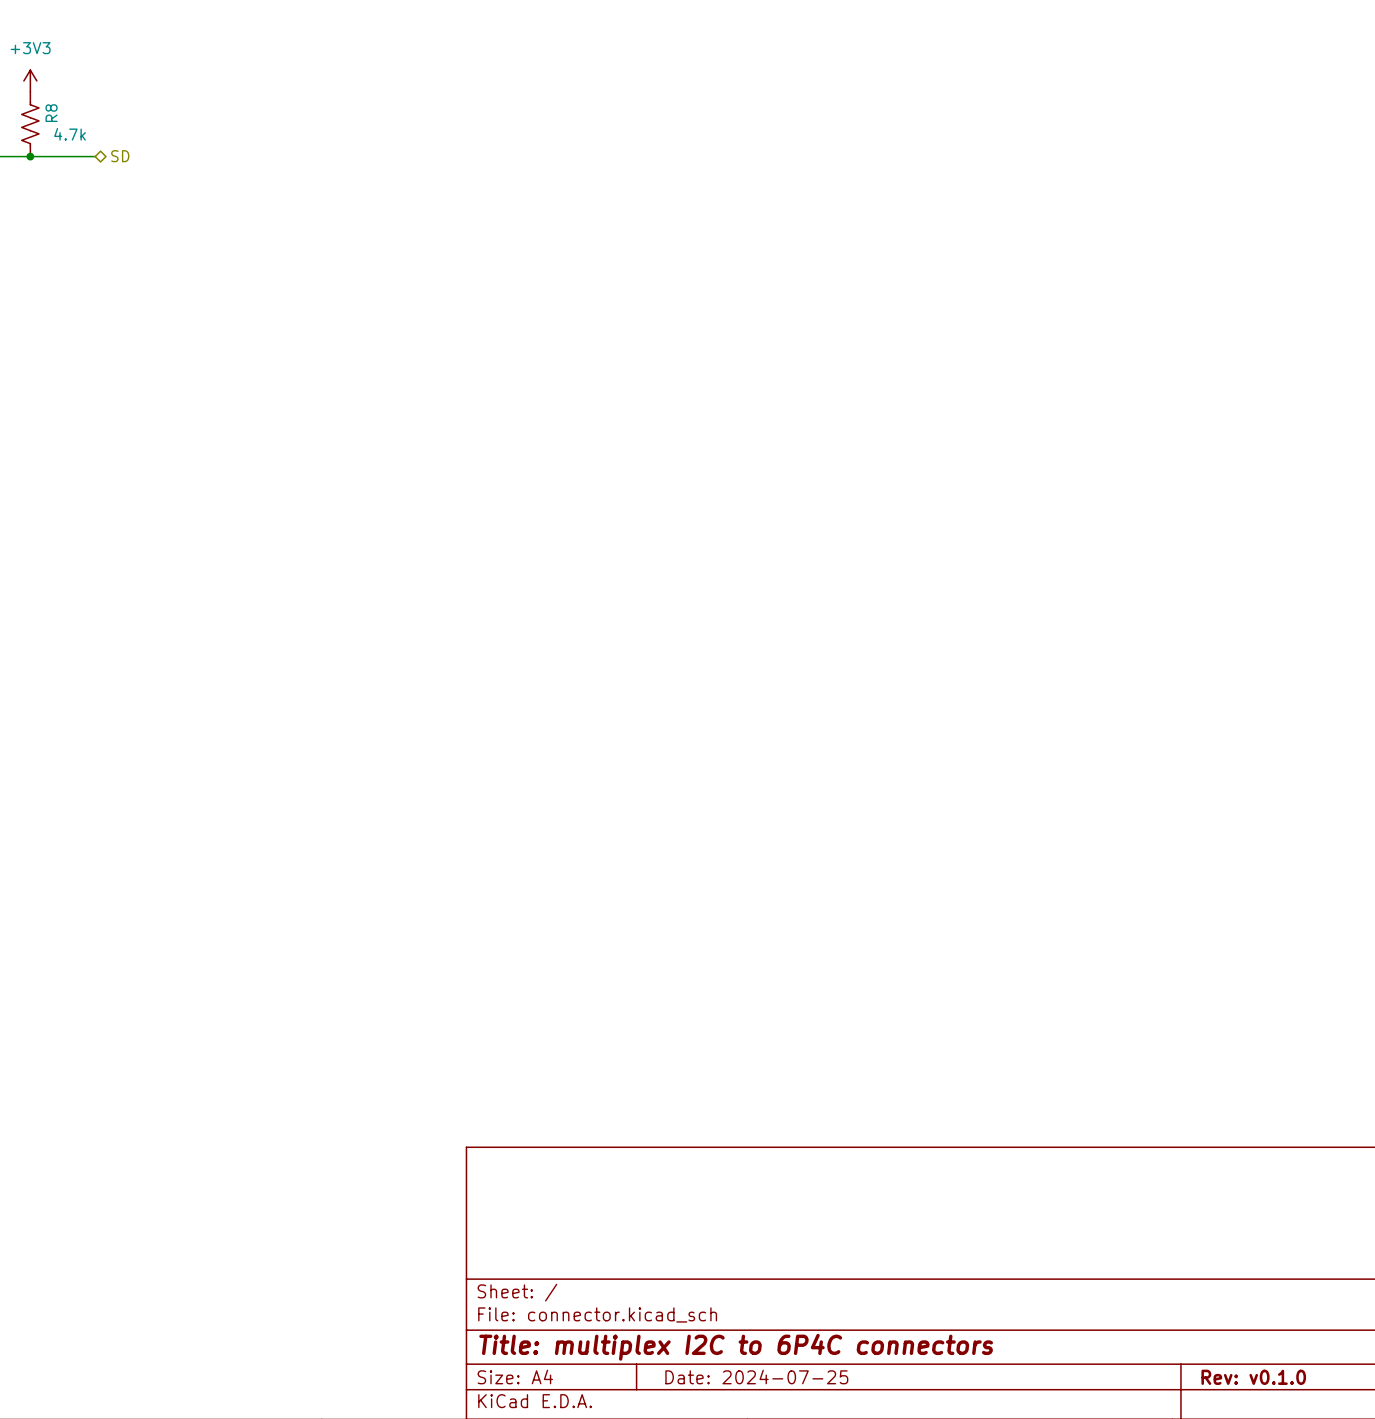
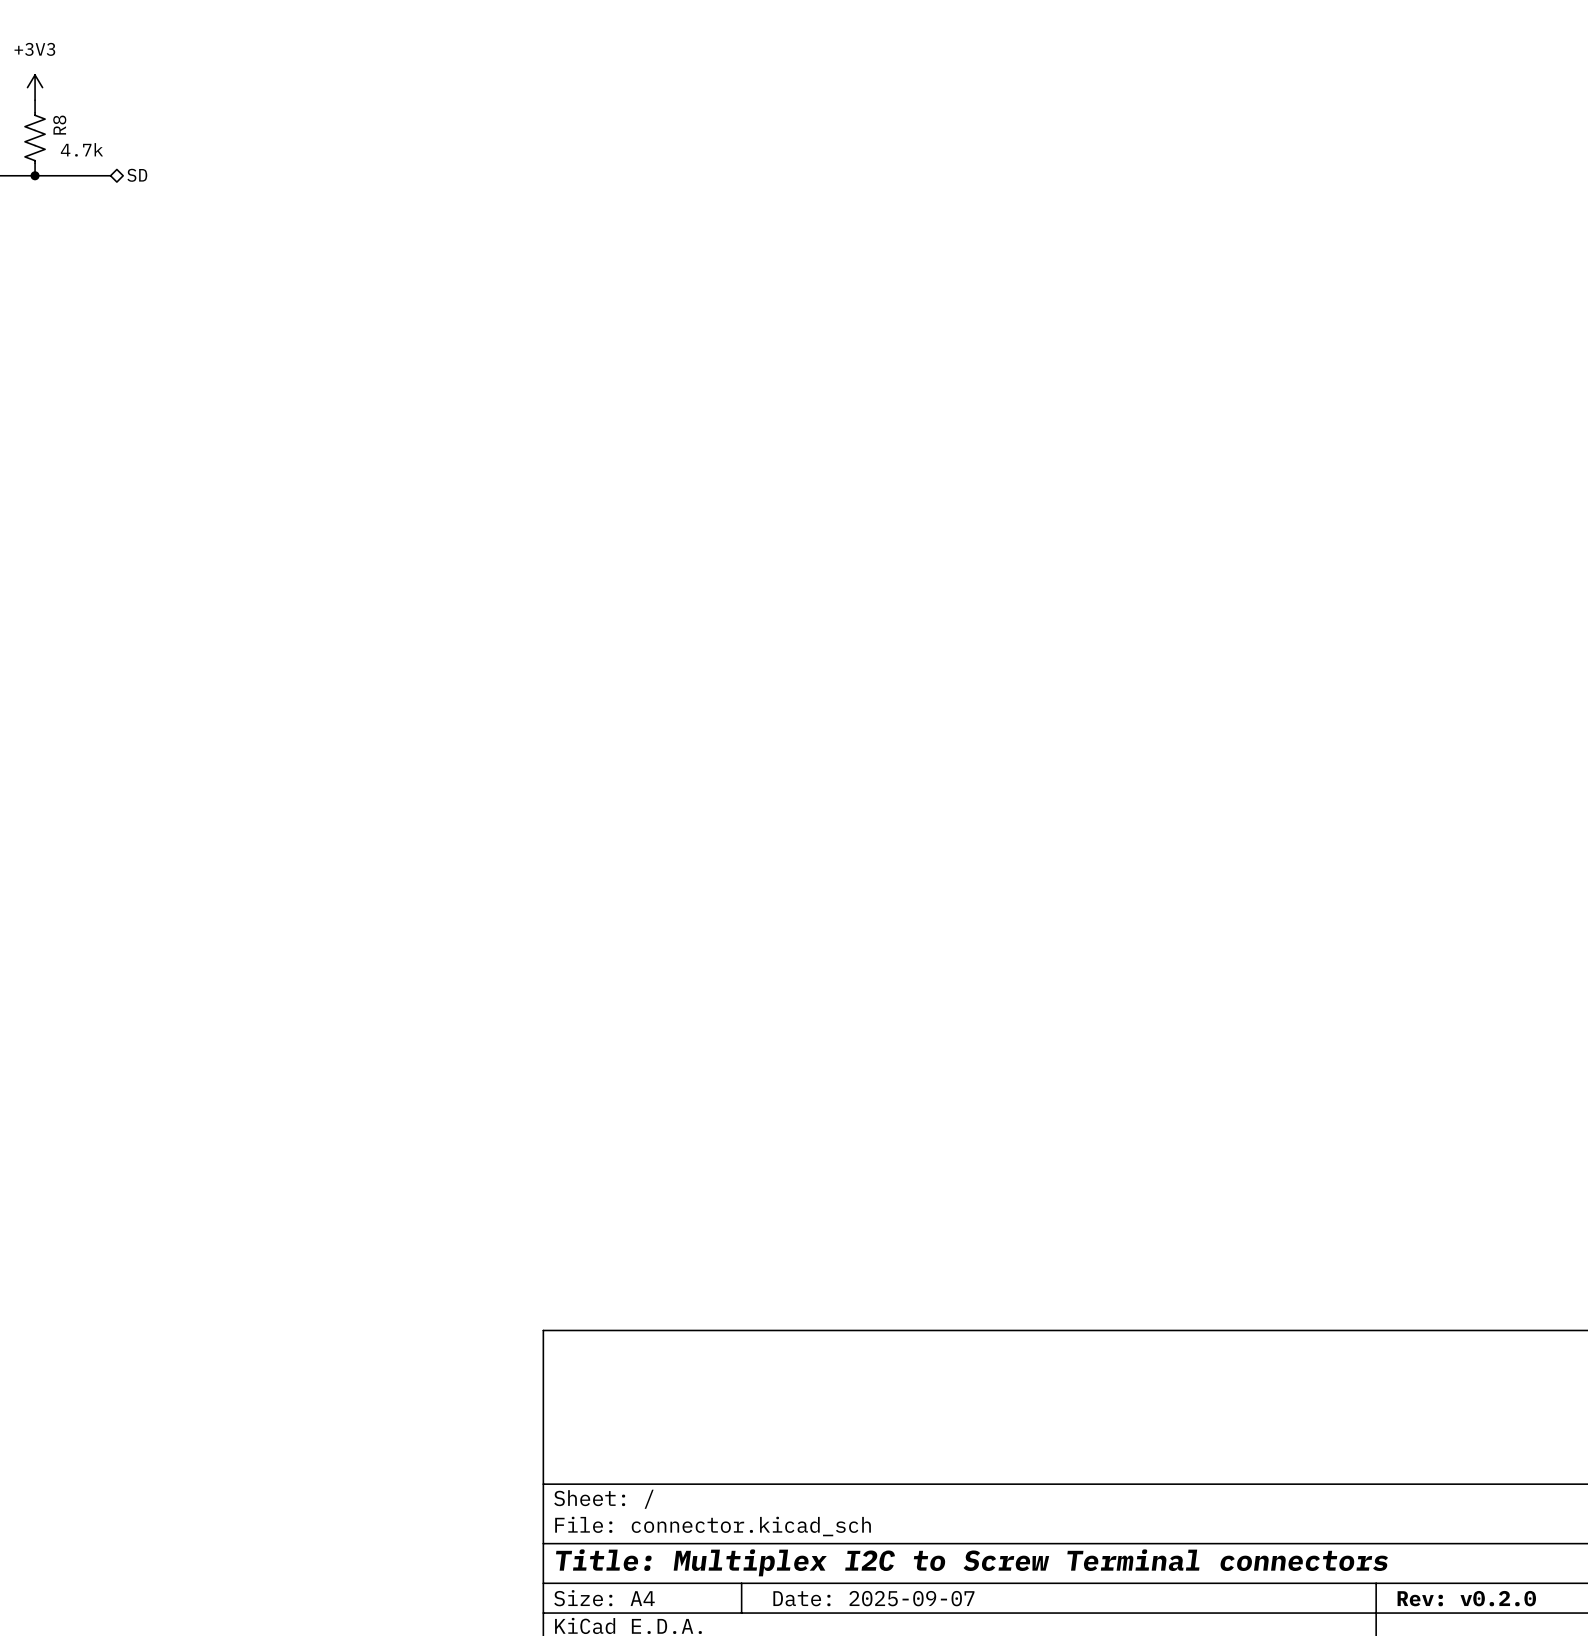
title block: Title: multiplex I2C to 6P4C connectors (736, 1347) -> Title: Multiplex I2C to Screw Terminal connectors (972, 1562)
title block: Date: 2024-07-25 (756, 1377) -> Date: 2025-09-07 (873, 1598)
title block: Rev: v0.1.0 (1253, 1377) -> Rev: v0.2.0 (1466, 1598)

